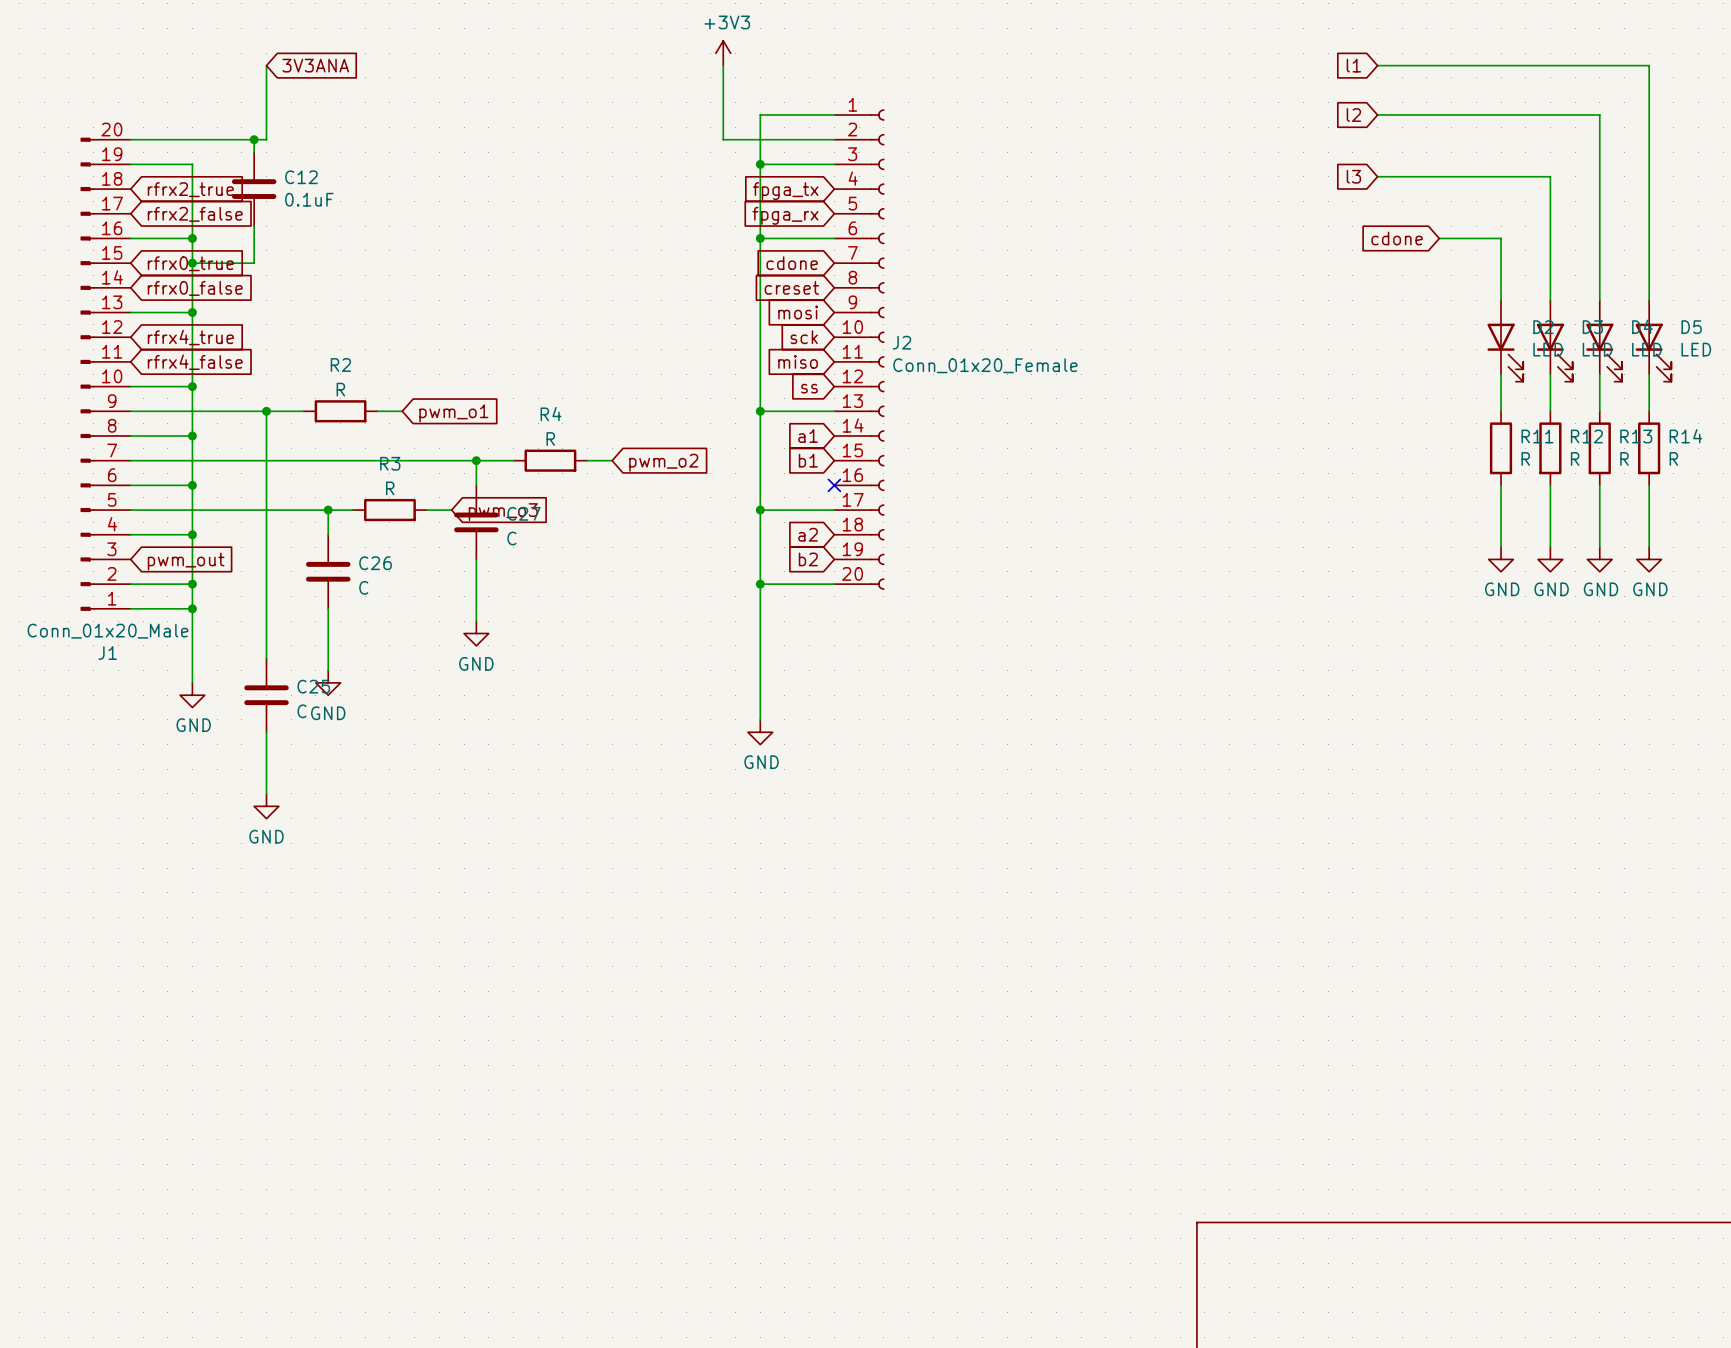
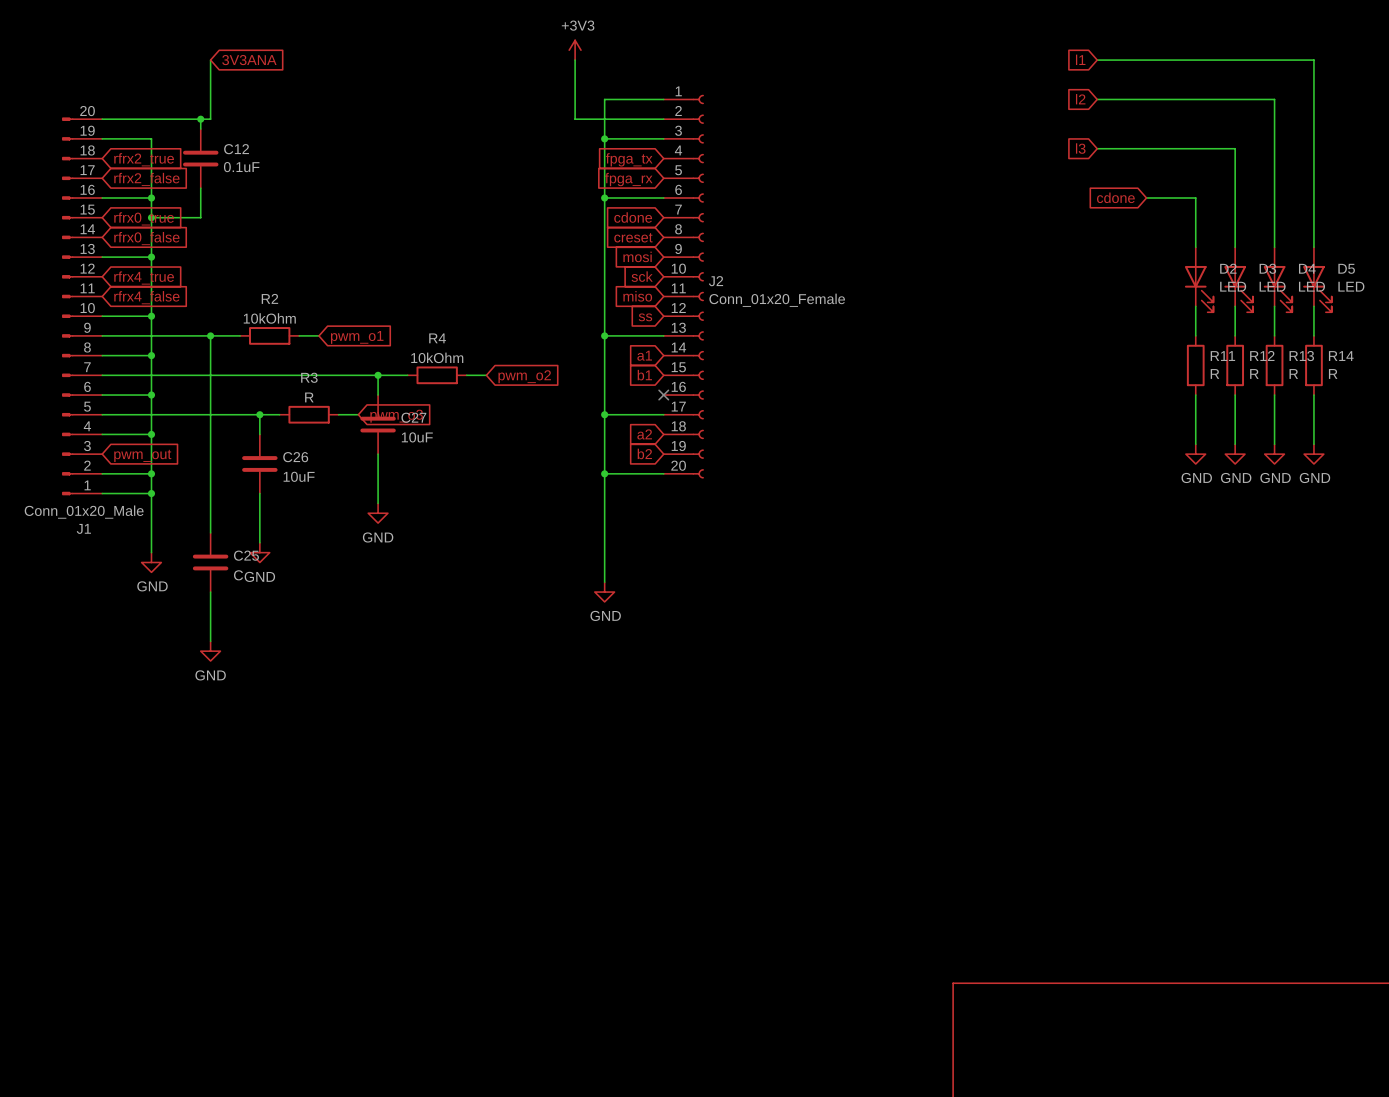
R2 value: R (340, 389) -> 10kOhm (269, 318)
R4 value: R (550, 439) -> 10kOhm (437, 357)
C27 value: C (511, 538) -> 10uF (417, 437)
C26 value: C (363, 587) -> 10uF (299, 476)

